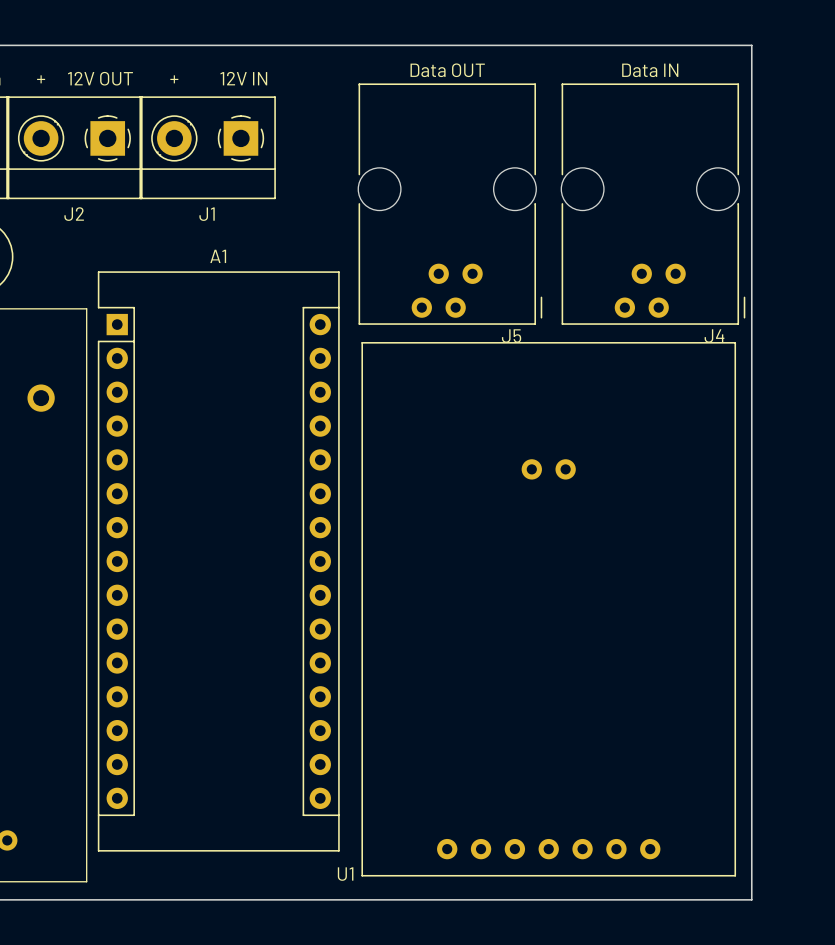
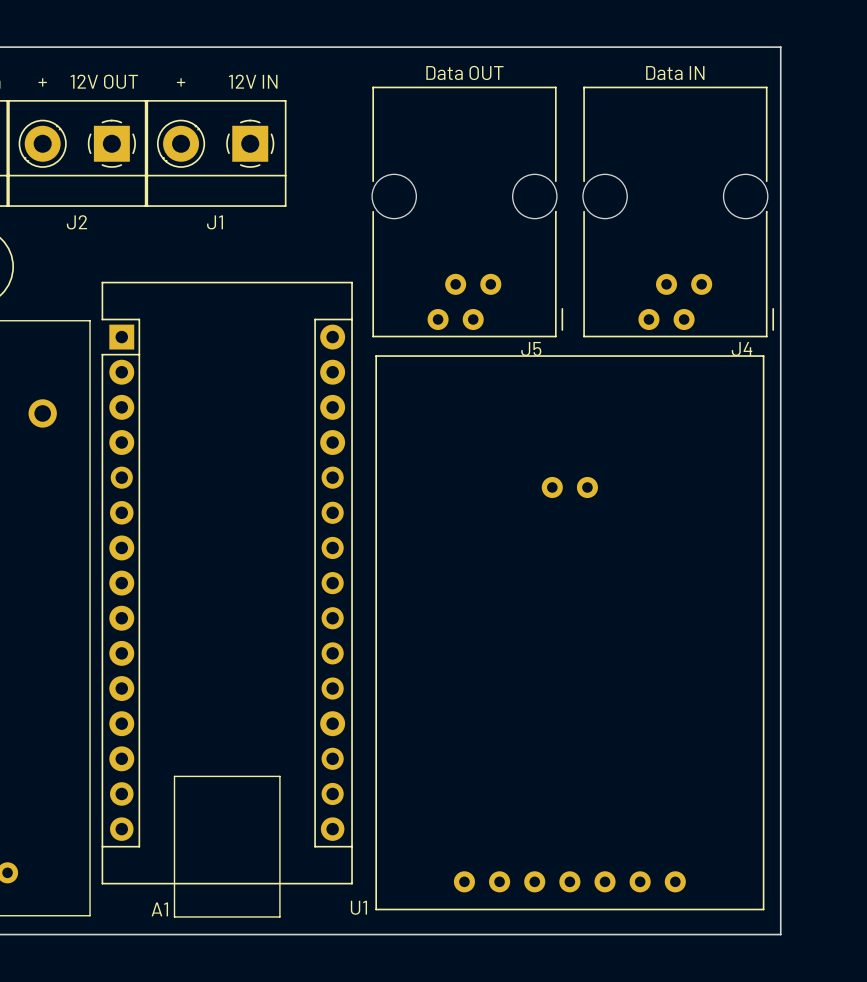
A1 name position: A1 (218, 256) -> A1 (159, 909)
A1 footprint: [97, 271, 340, 852] -> [101, 281, 353, 918]

